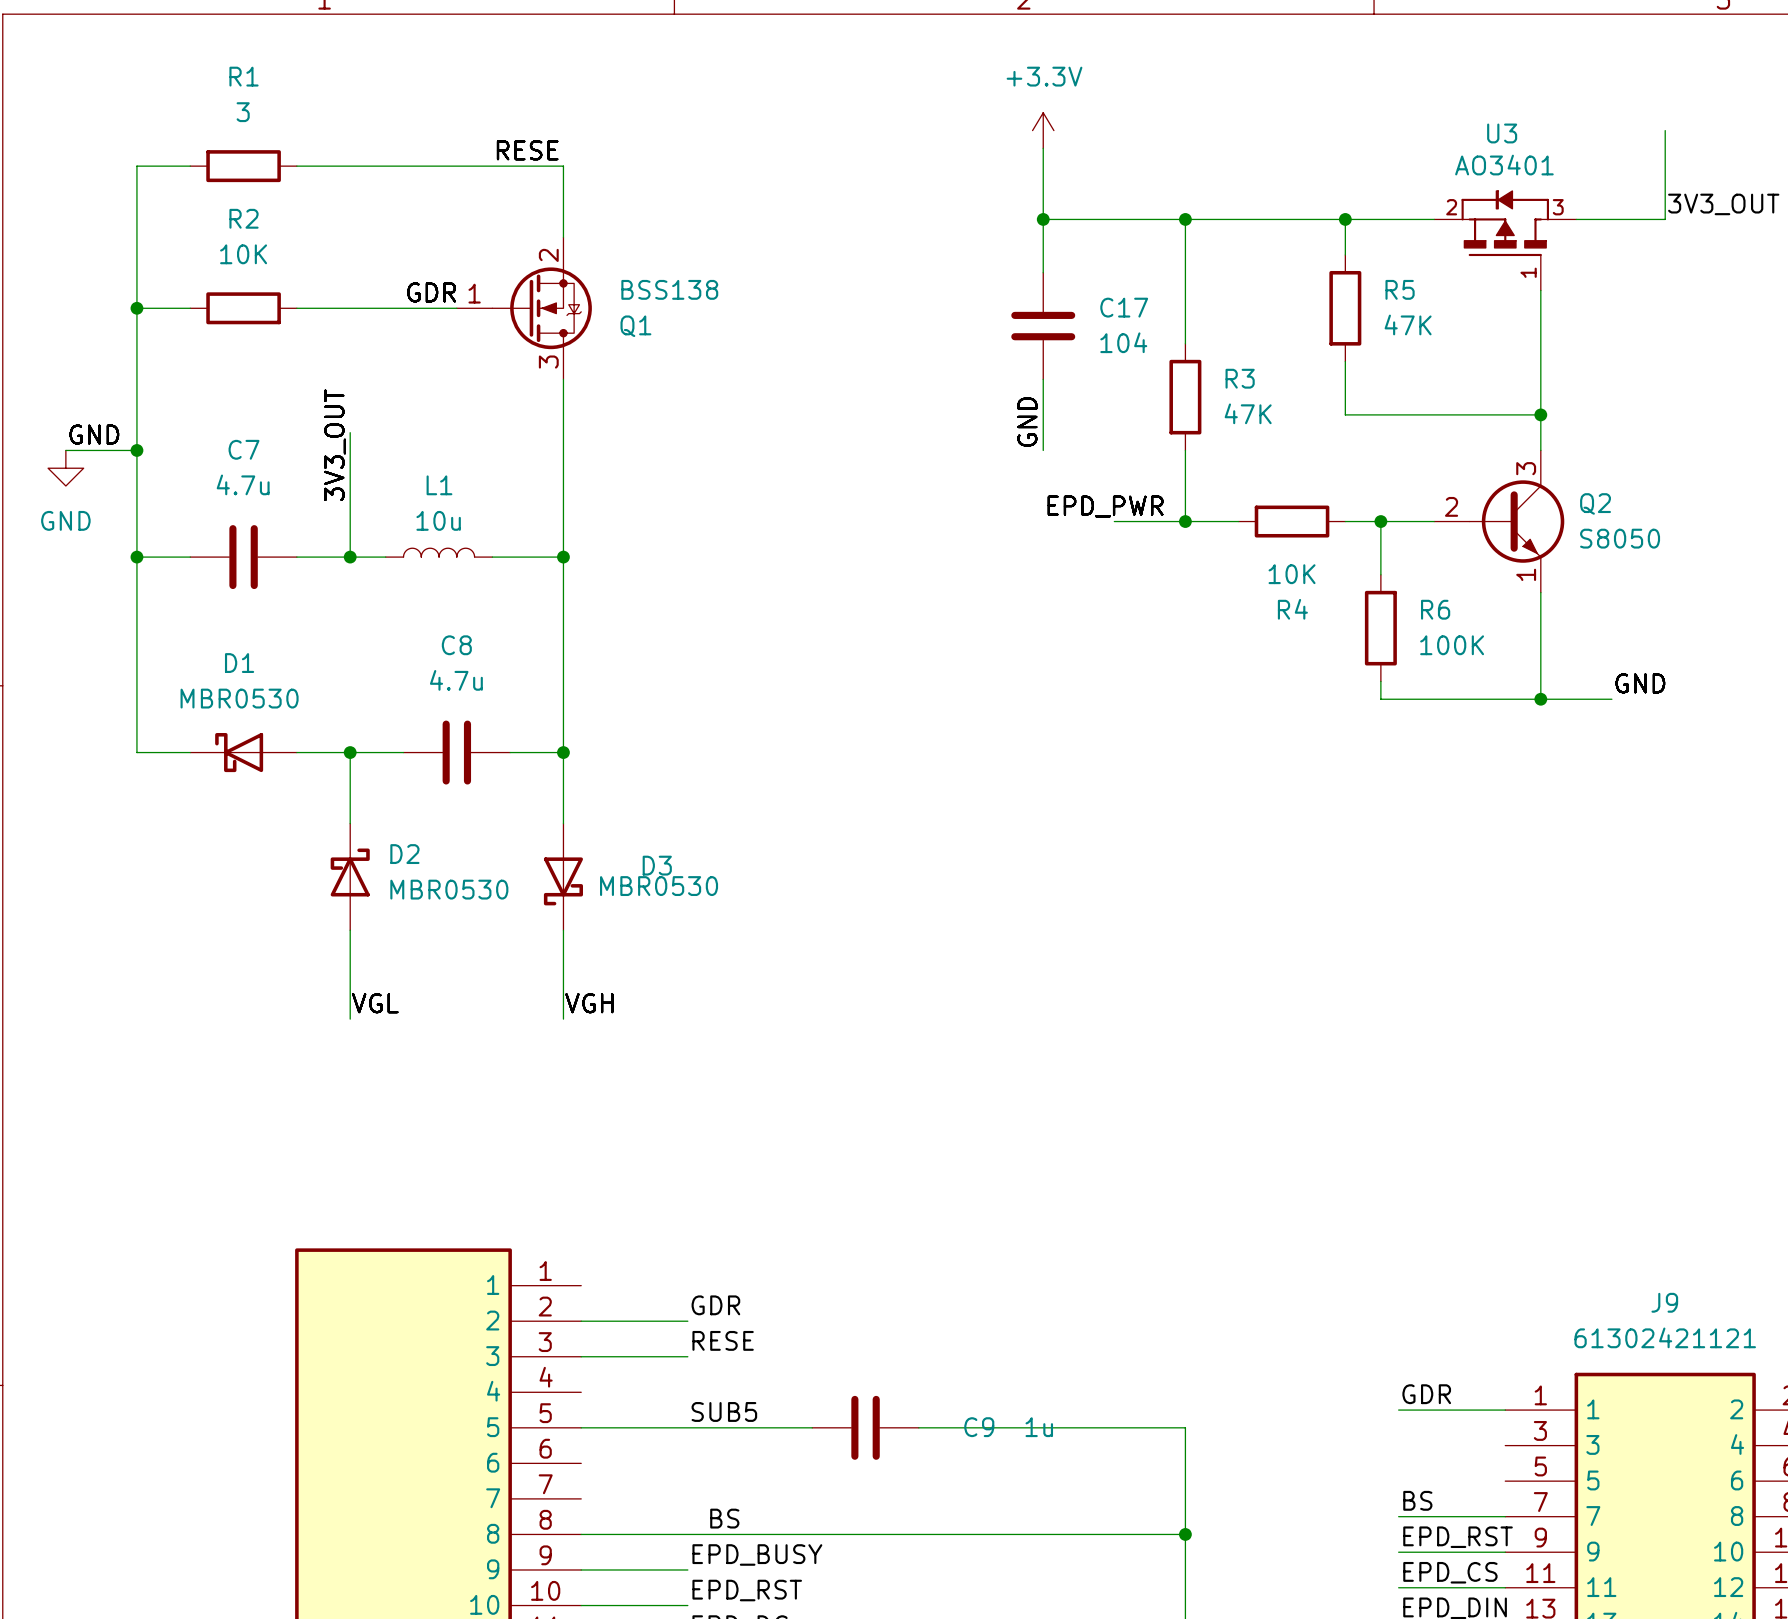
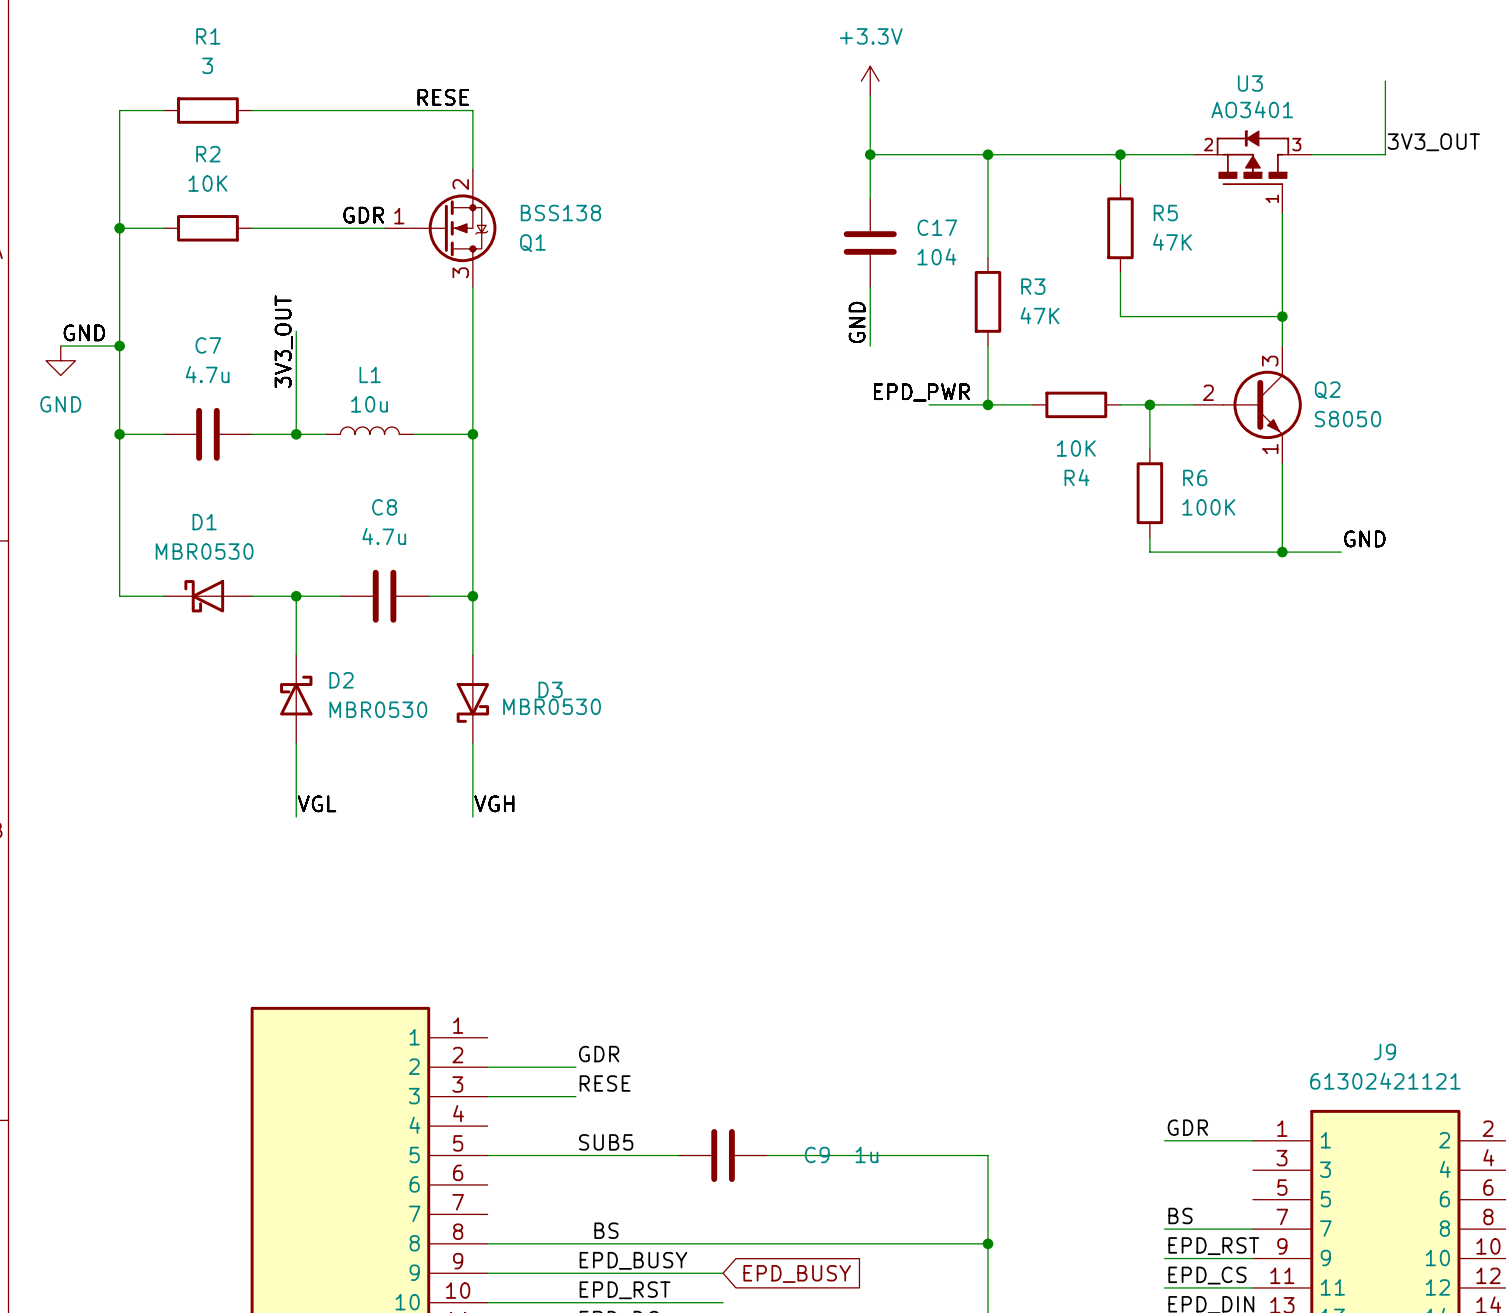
wire: none -> (575, 1273) (723, 1273)
global label: none -> EPD_BUSY (797, 1273)
wire: none -> (575, 1302) (723, 1302)

